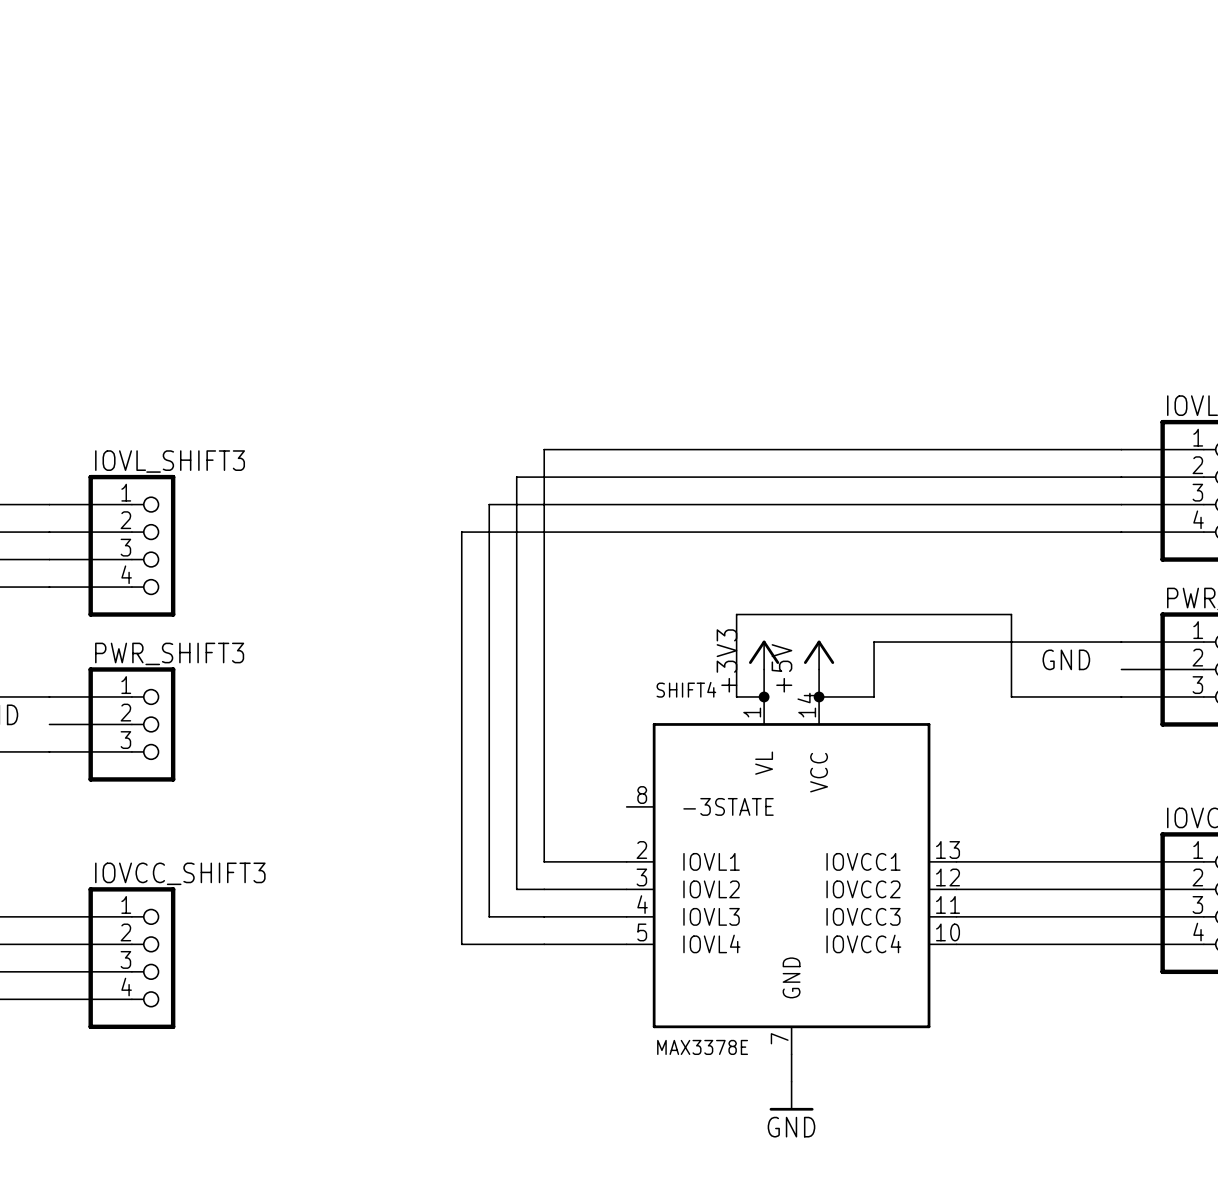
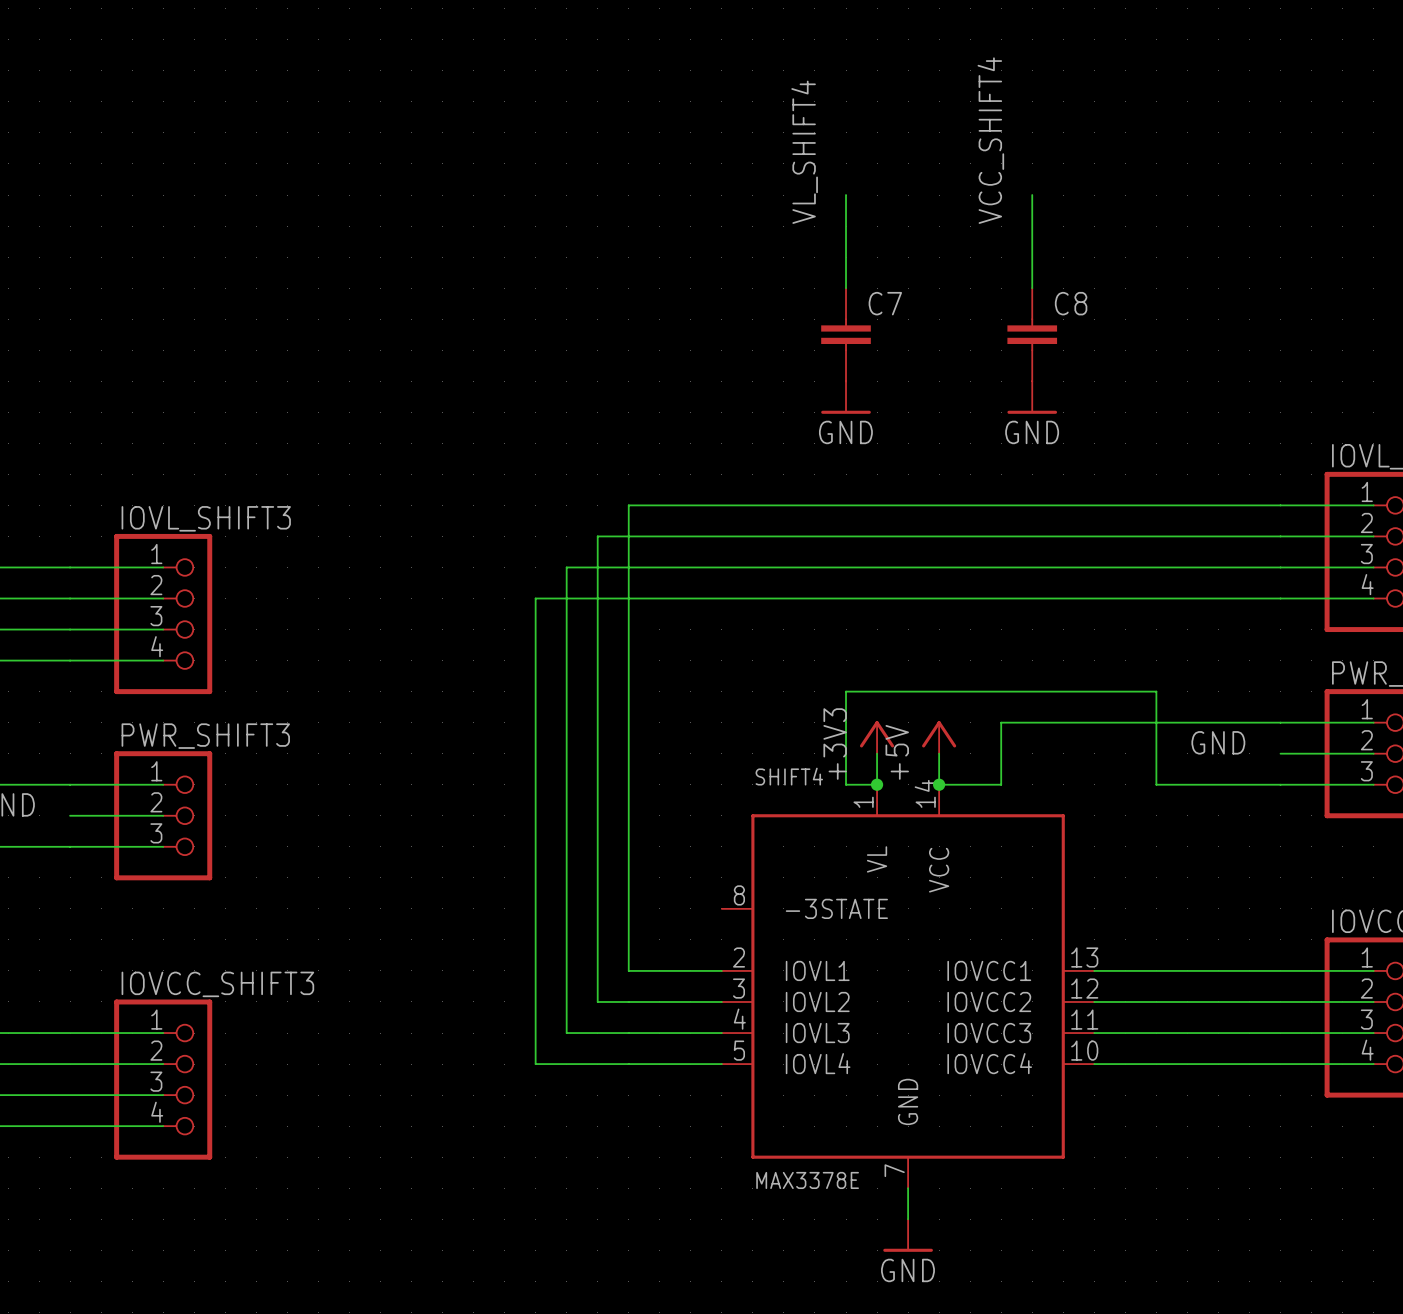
label: none -> VCC_SHIFT4 (990, 140)
label: none -> VL_SHIFT4 (804, 152)
wire: none -> (846, 195) (846, 288)
wire: none -> (1032, 195) (1032, 288)
C7: none -> (846, 334)
C8: none -> (1032, 334)
power symbol: none -> GND (846, 397)
power symbol: none -> GND (1032, 397)

